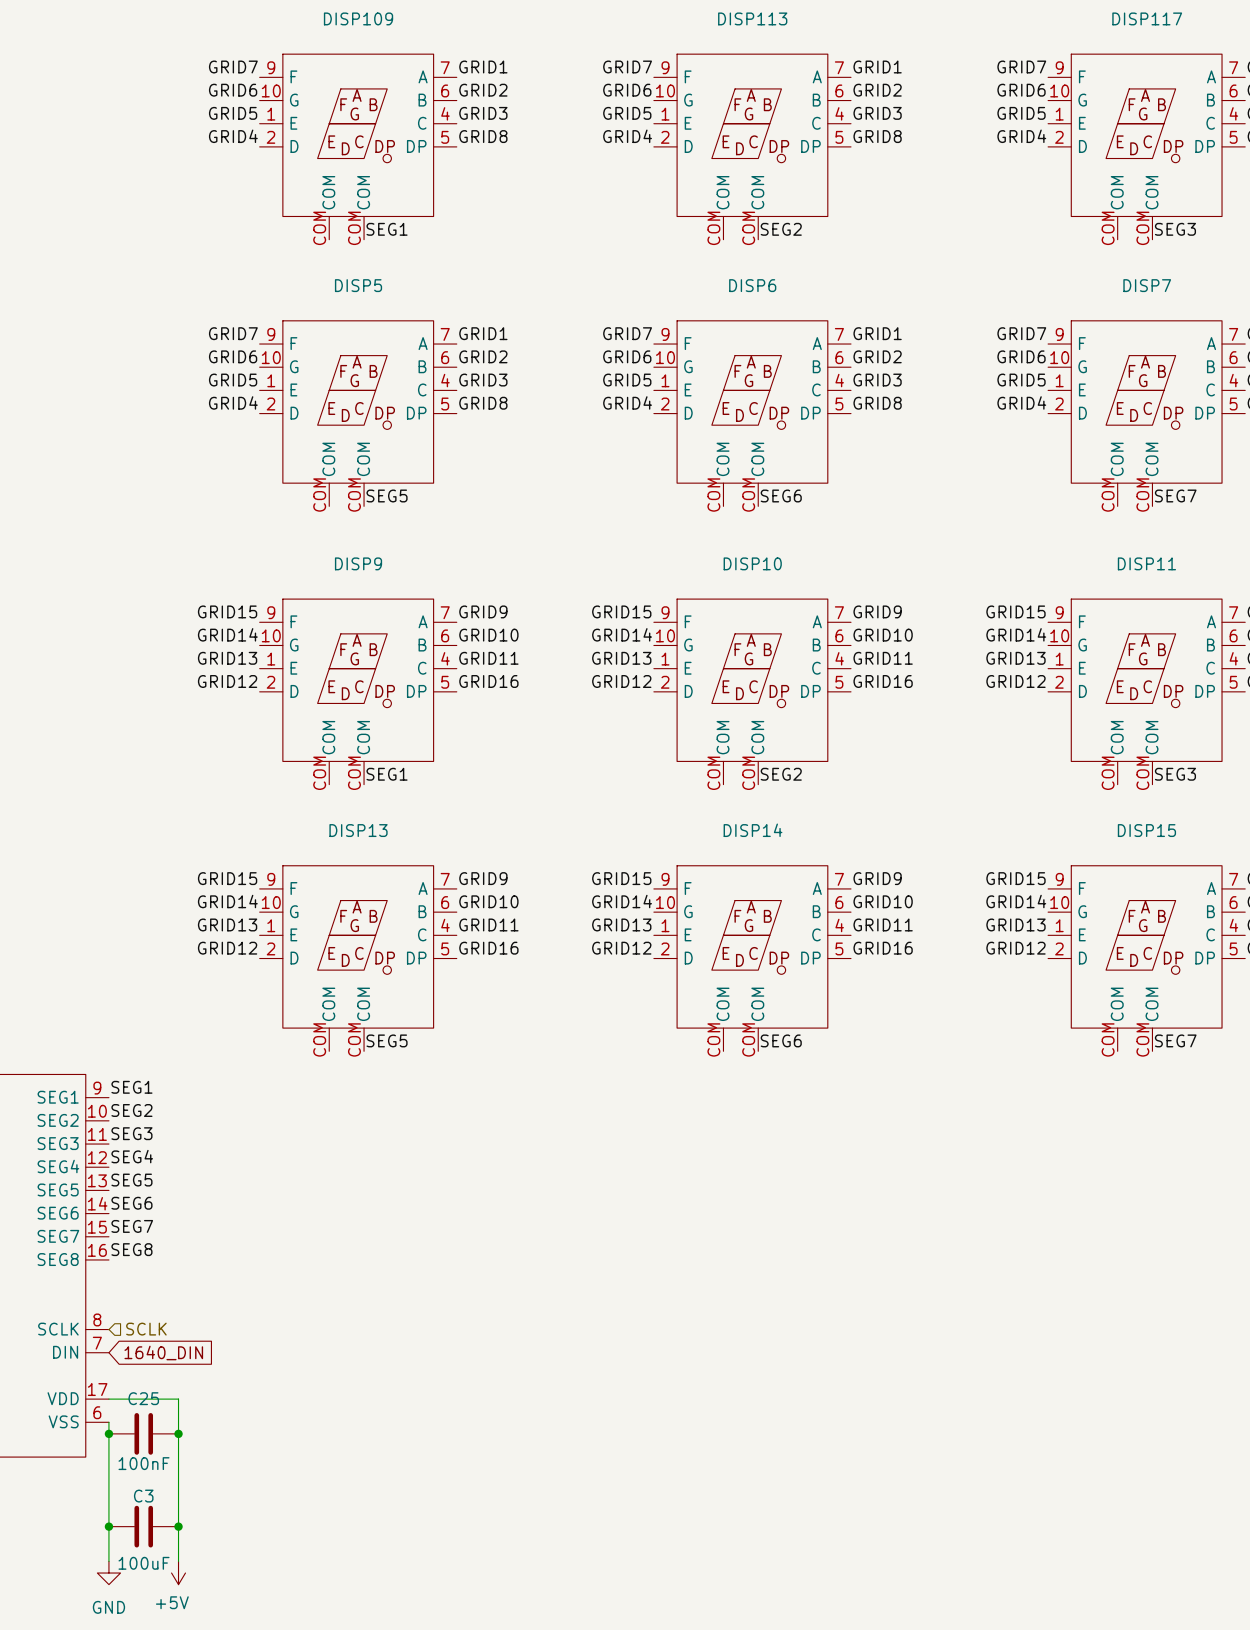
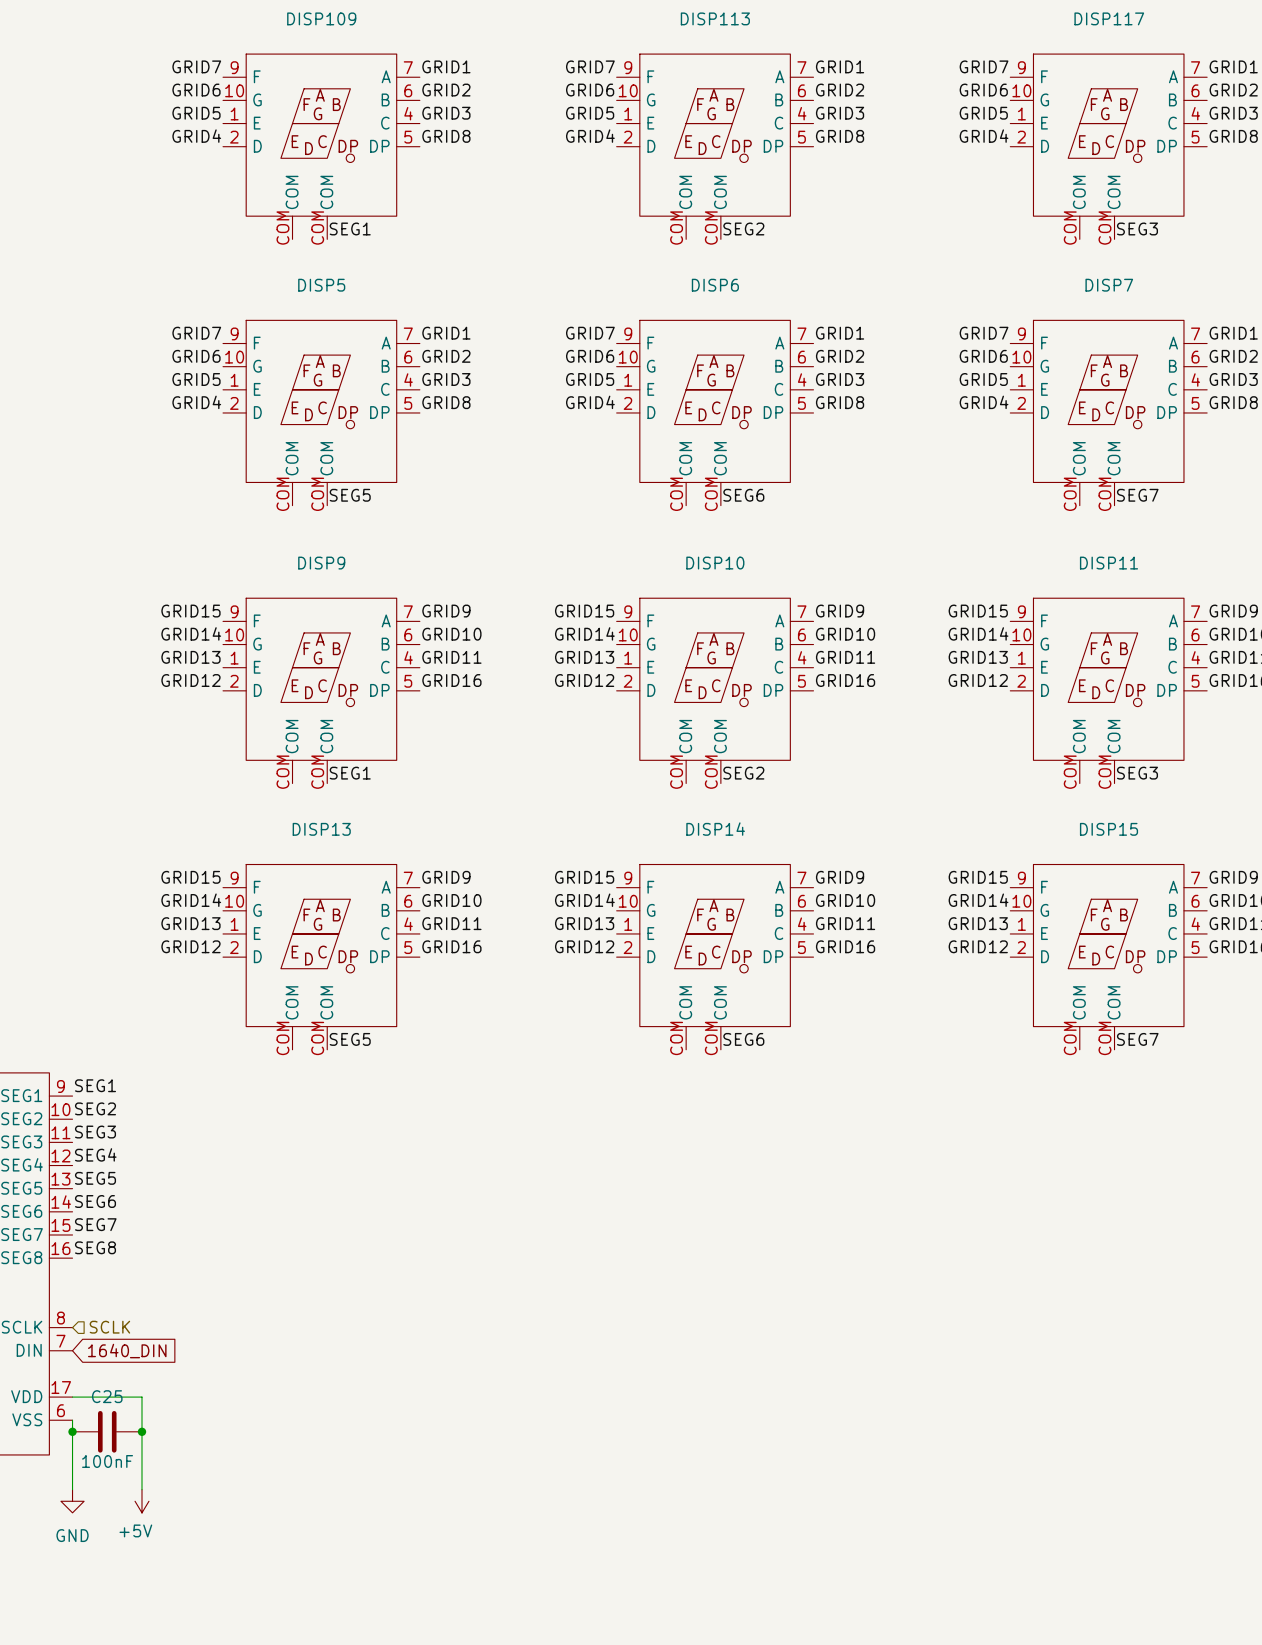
wire: (108, 1491) (108, 1561) -> none
wire: (178, 1491) (178, 1561) -> none
junction: (108, 1526) -> none
C3: 100uF (143, 1526) -> none
junction: (178, 1526) -> none
power symbol position: GND (108, 1573) -> GND (72, 1501)
power symbol position: +5V (178, 1573) -> +5V (141, 1501)

